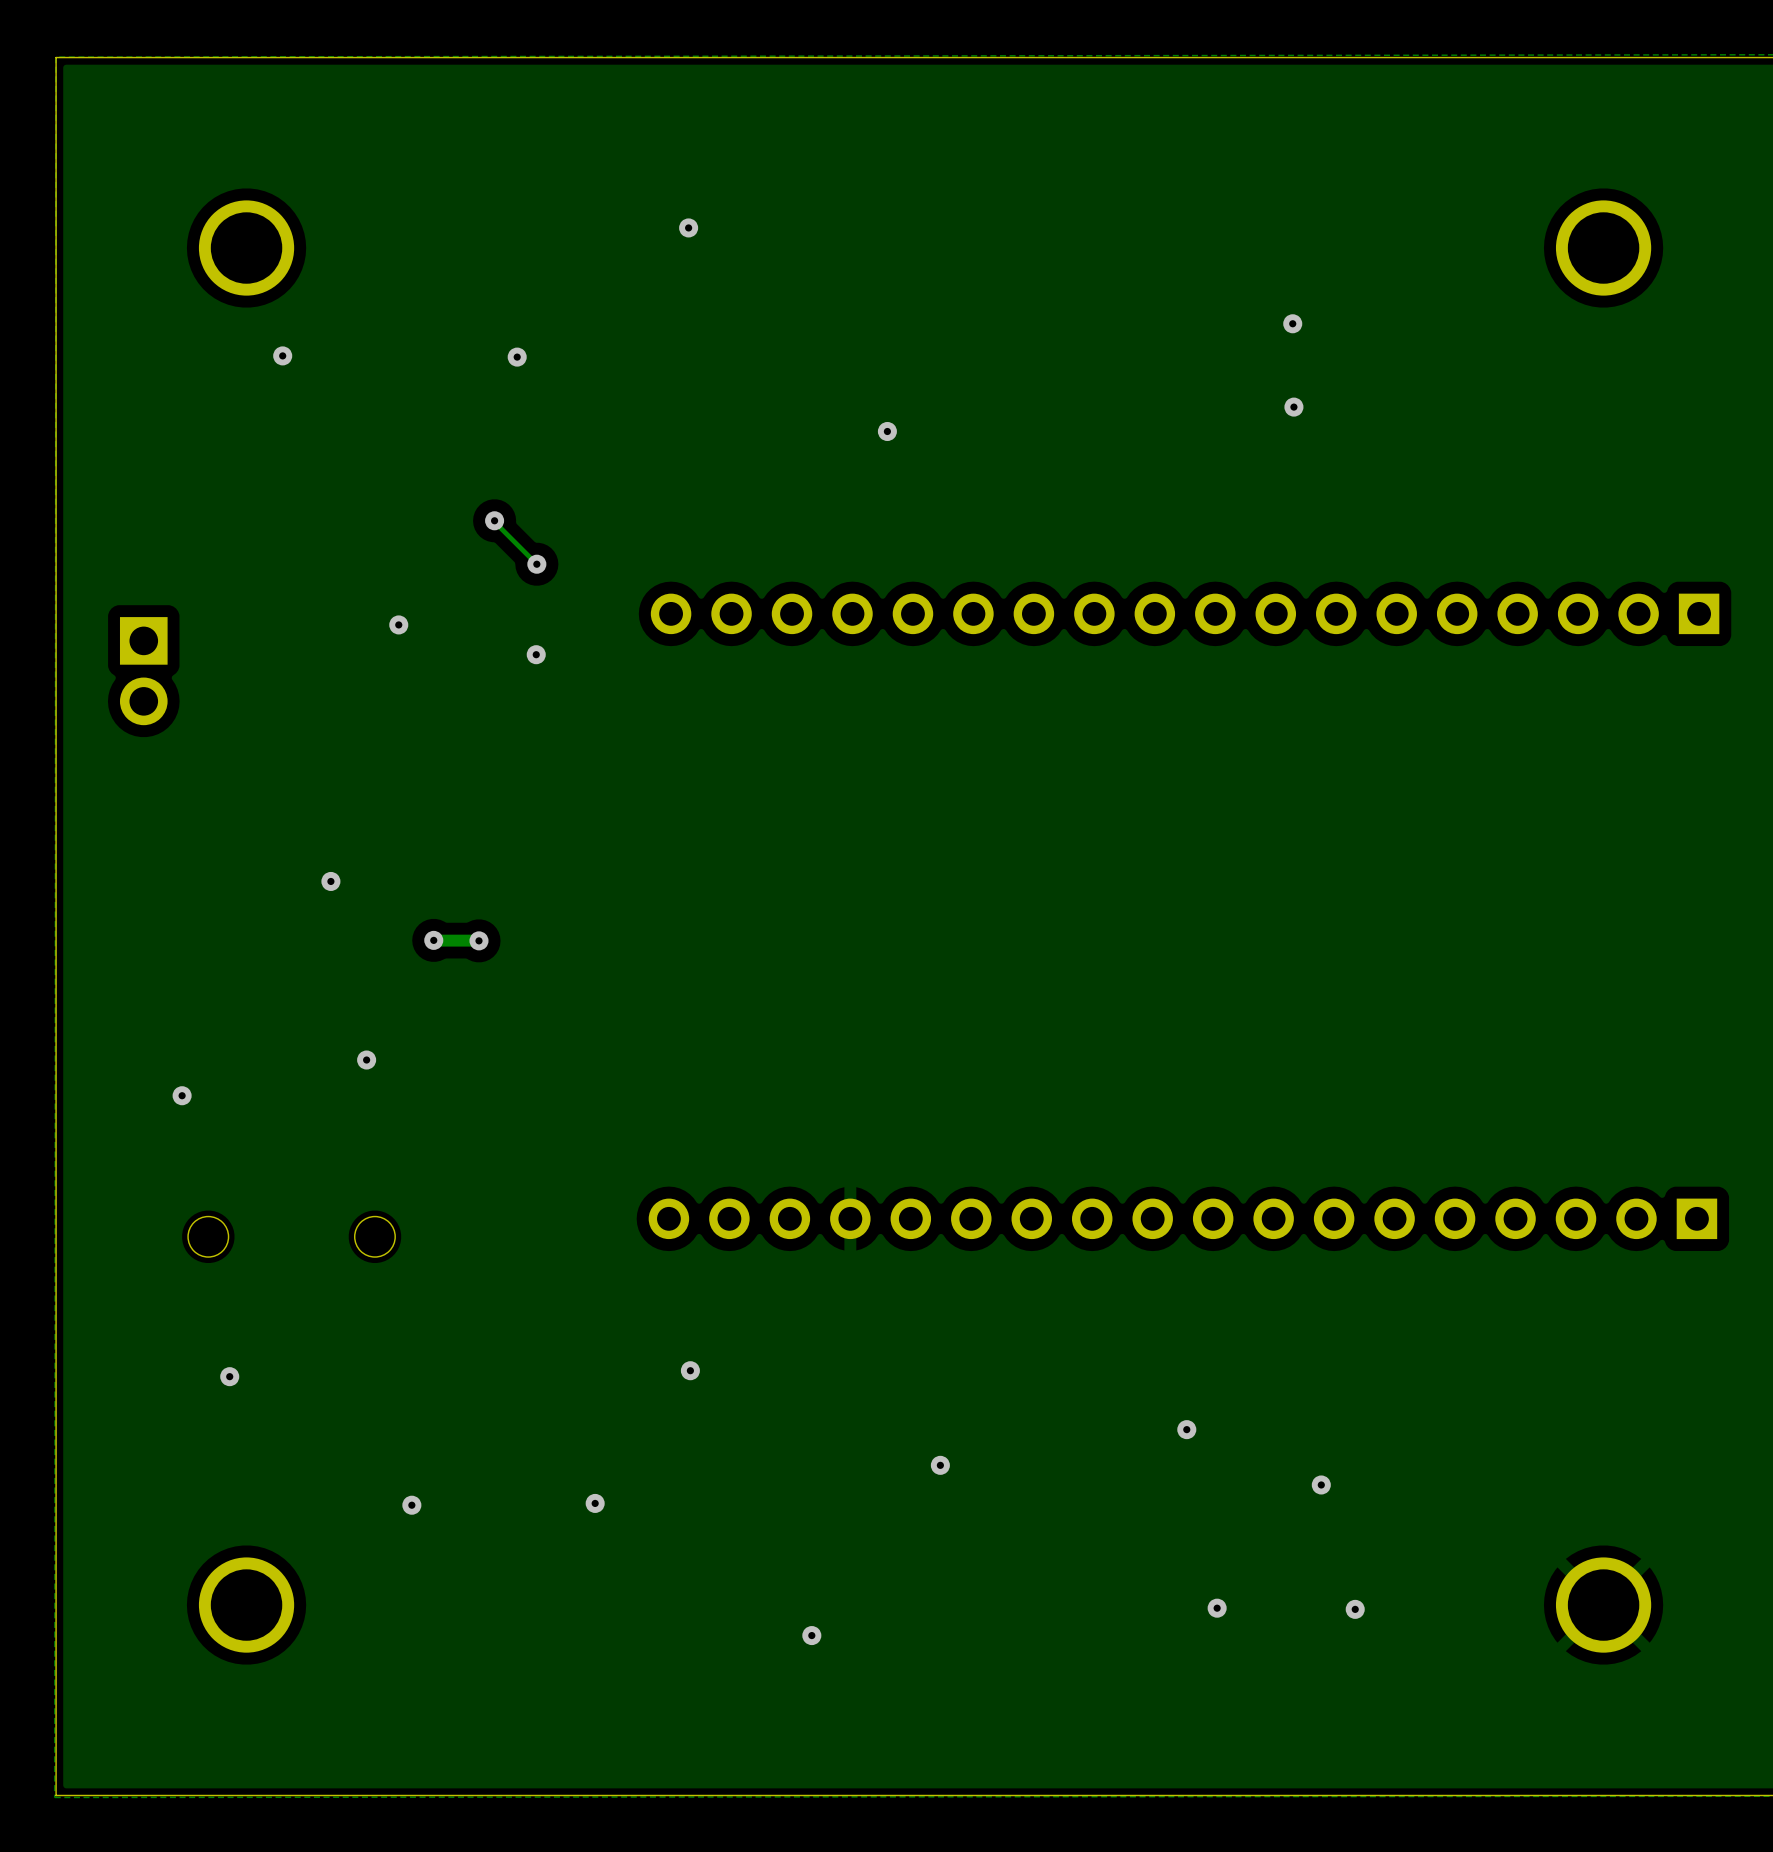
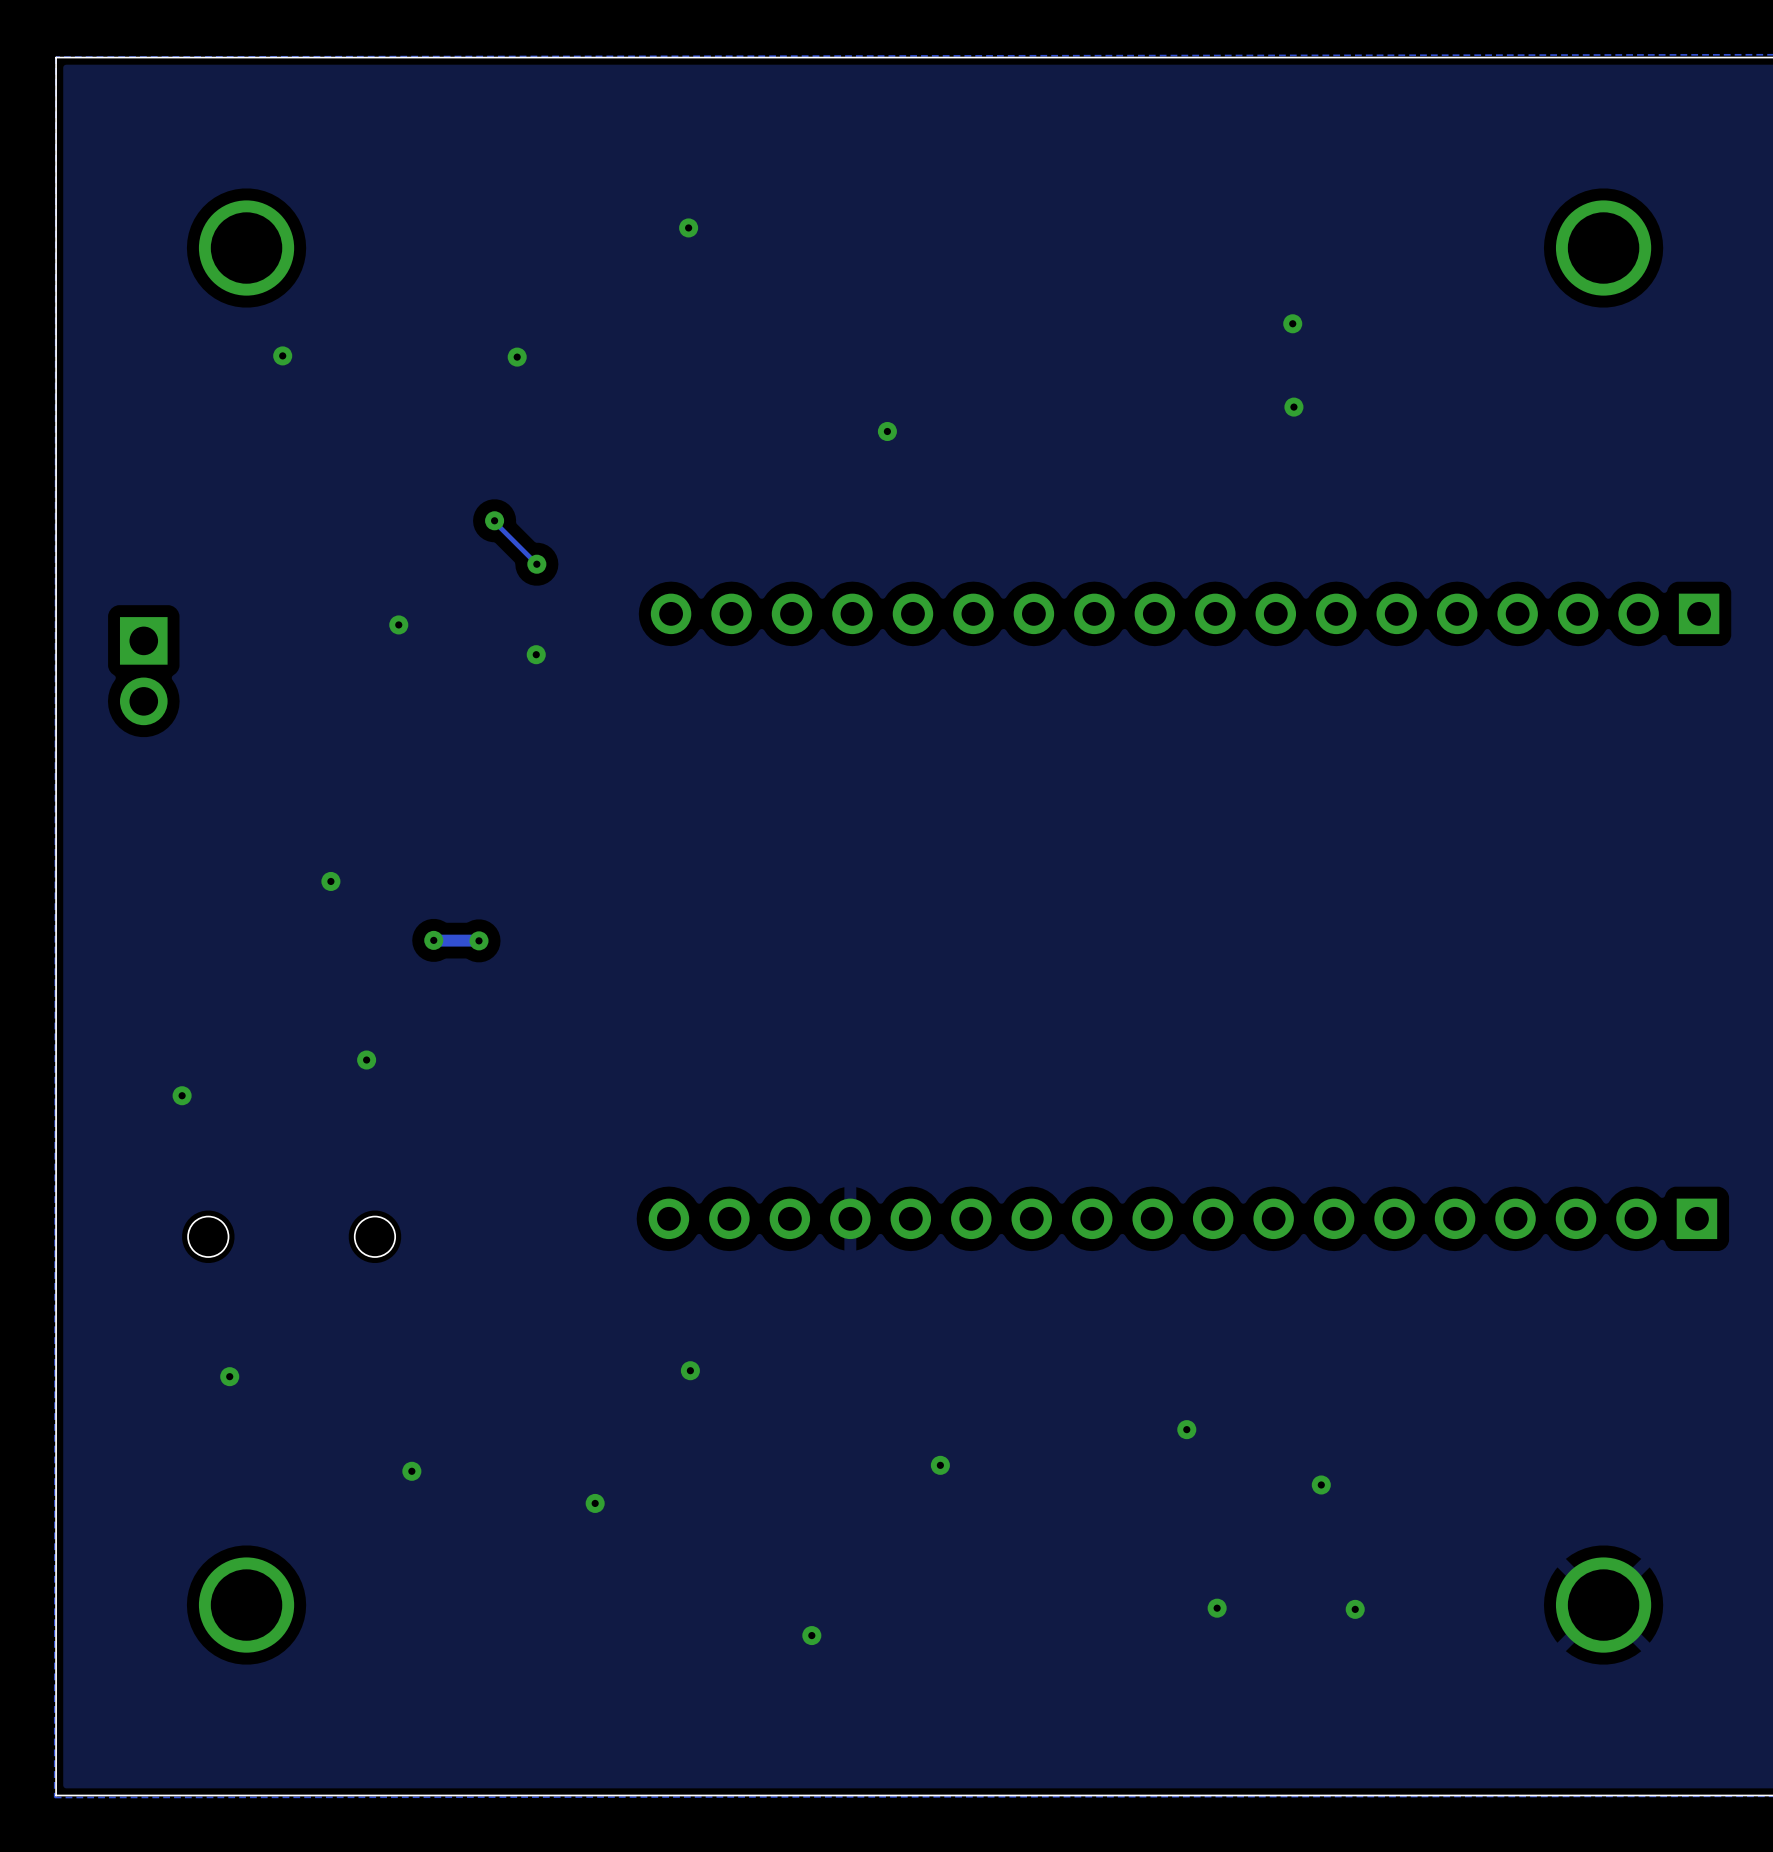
via position: (411, 1505) -> (411, 1471)

